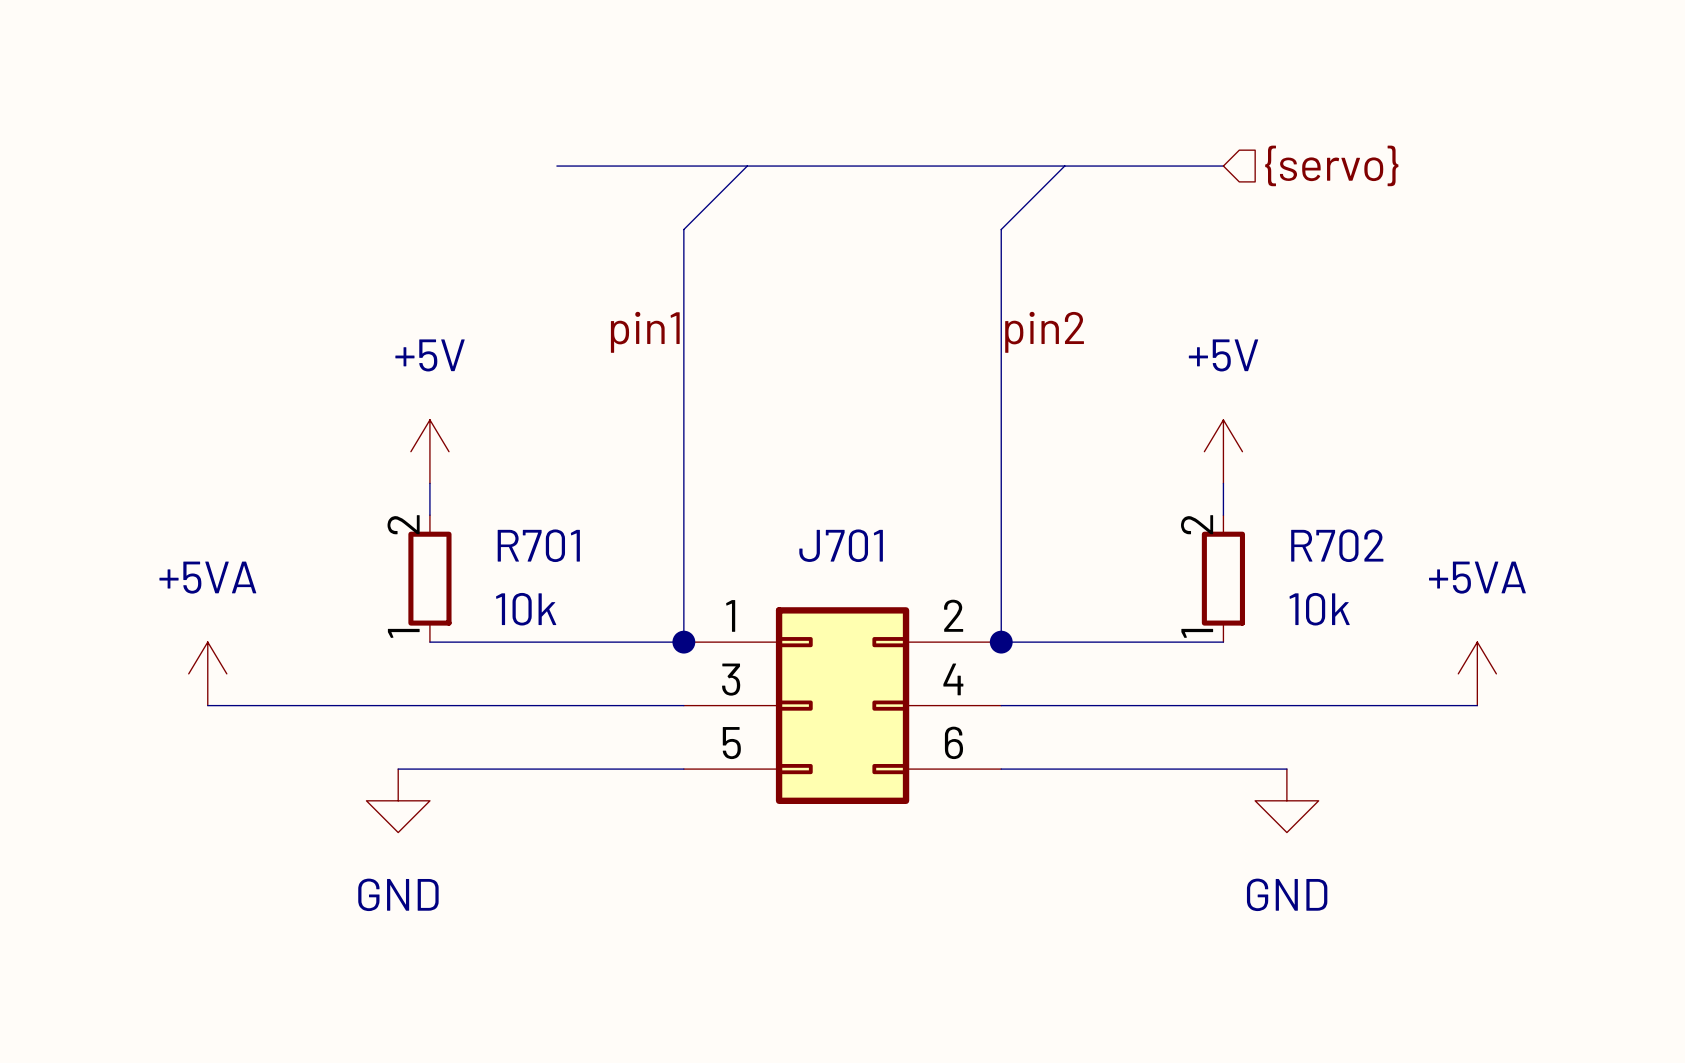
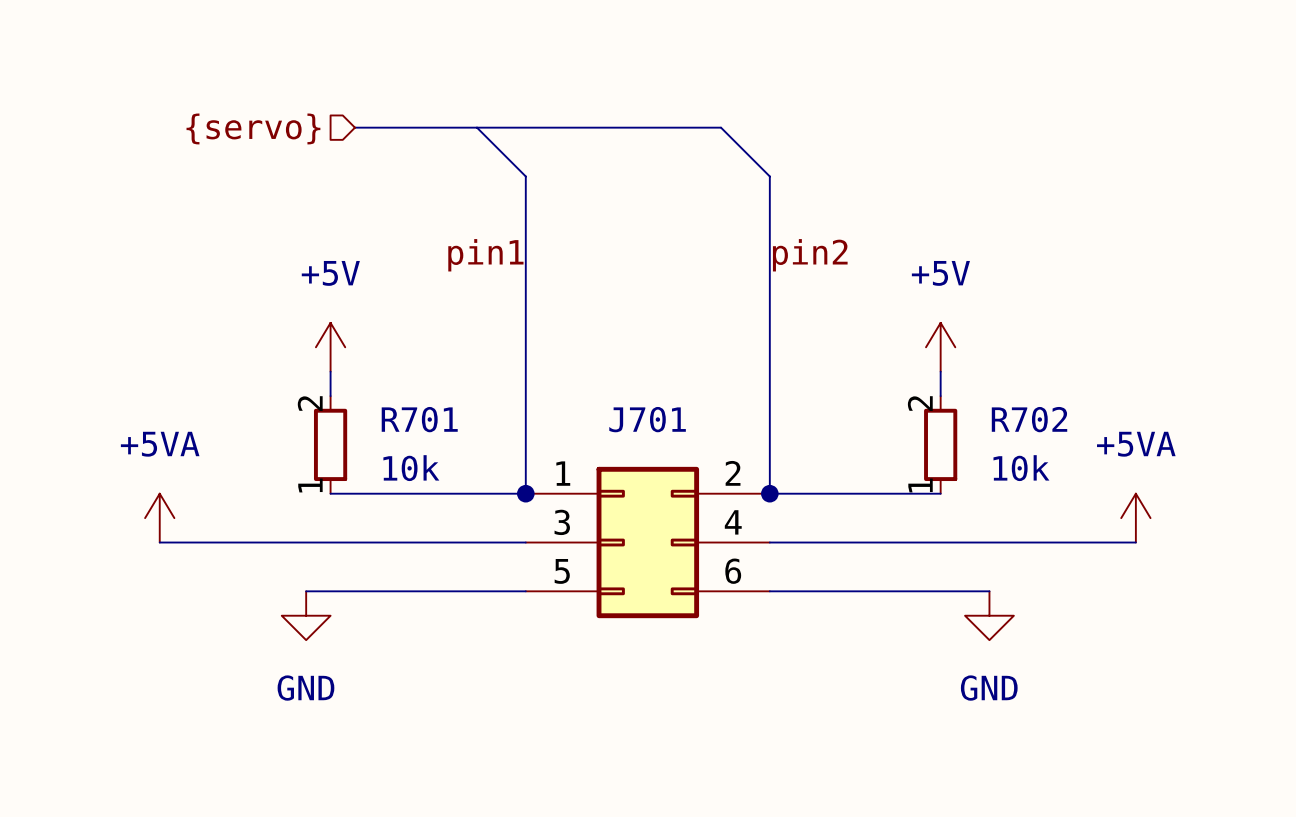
hierarchical label: none -> {servo} (253, 128)
hierarchical label: {servo} (1331, 165) -> none
bus: none -> (354, 127) (428, 127)
wire: (747, 166) (683, 229) -> (476, 127) (525, 176)
bus: (937, 166) (1223, 166) -> none
wire: (1064, 166) (1001, 229) -> (721, 127) (769, 176)

